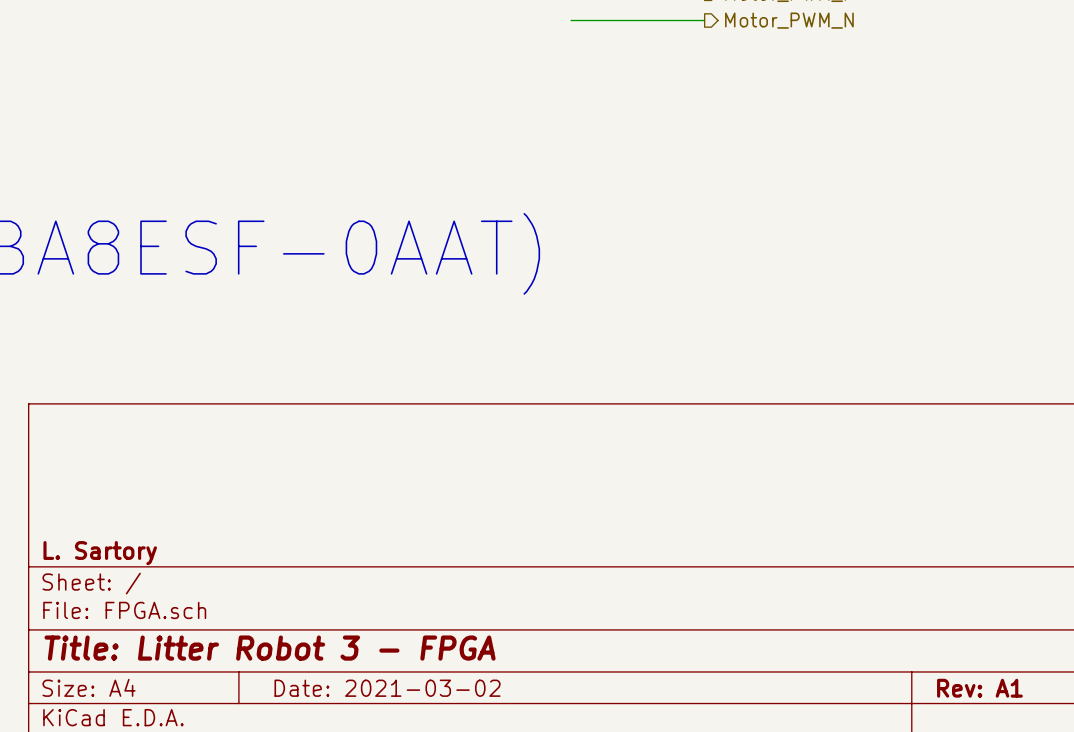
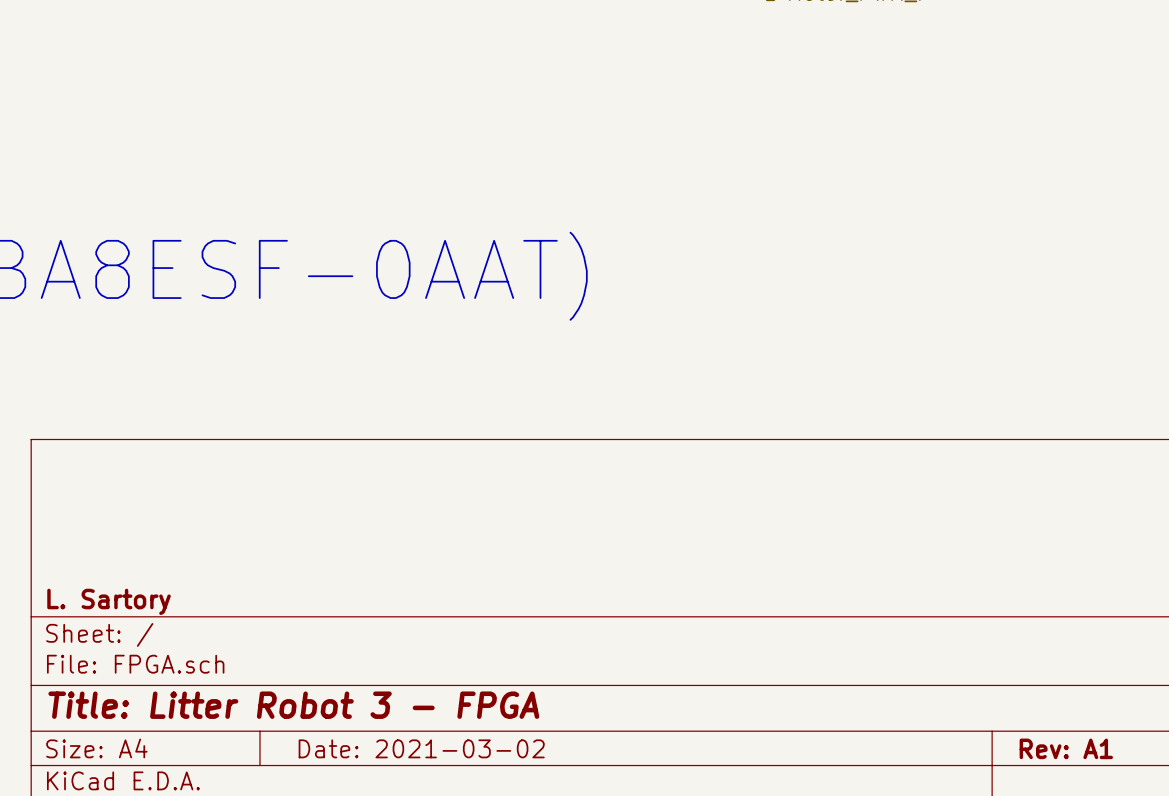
wire: (571, 20) (704, 20) -> none
hierarchical label: Motor_PWM_N (789, 20) -> none

